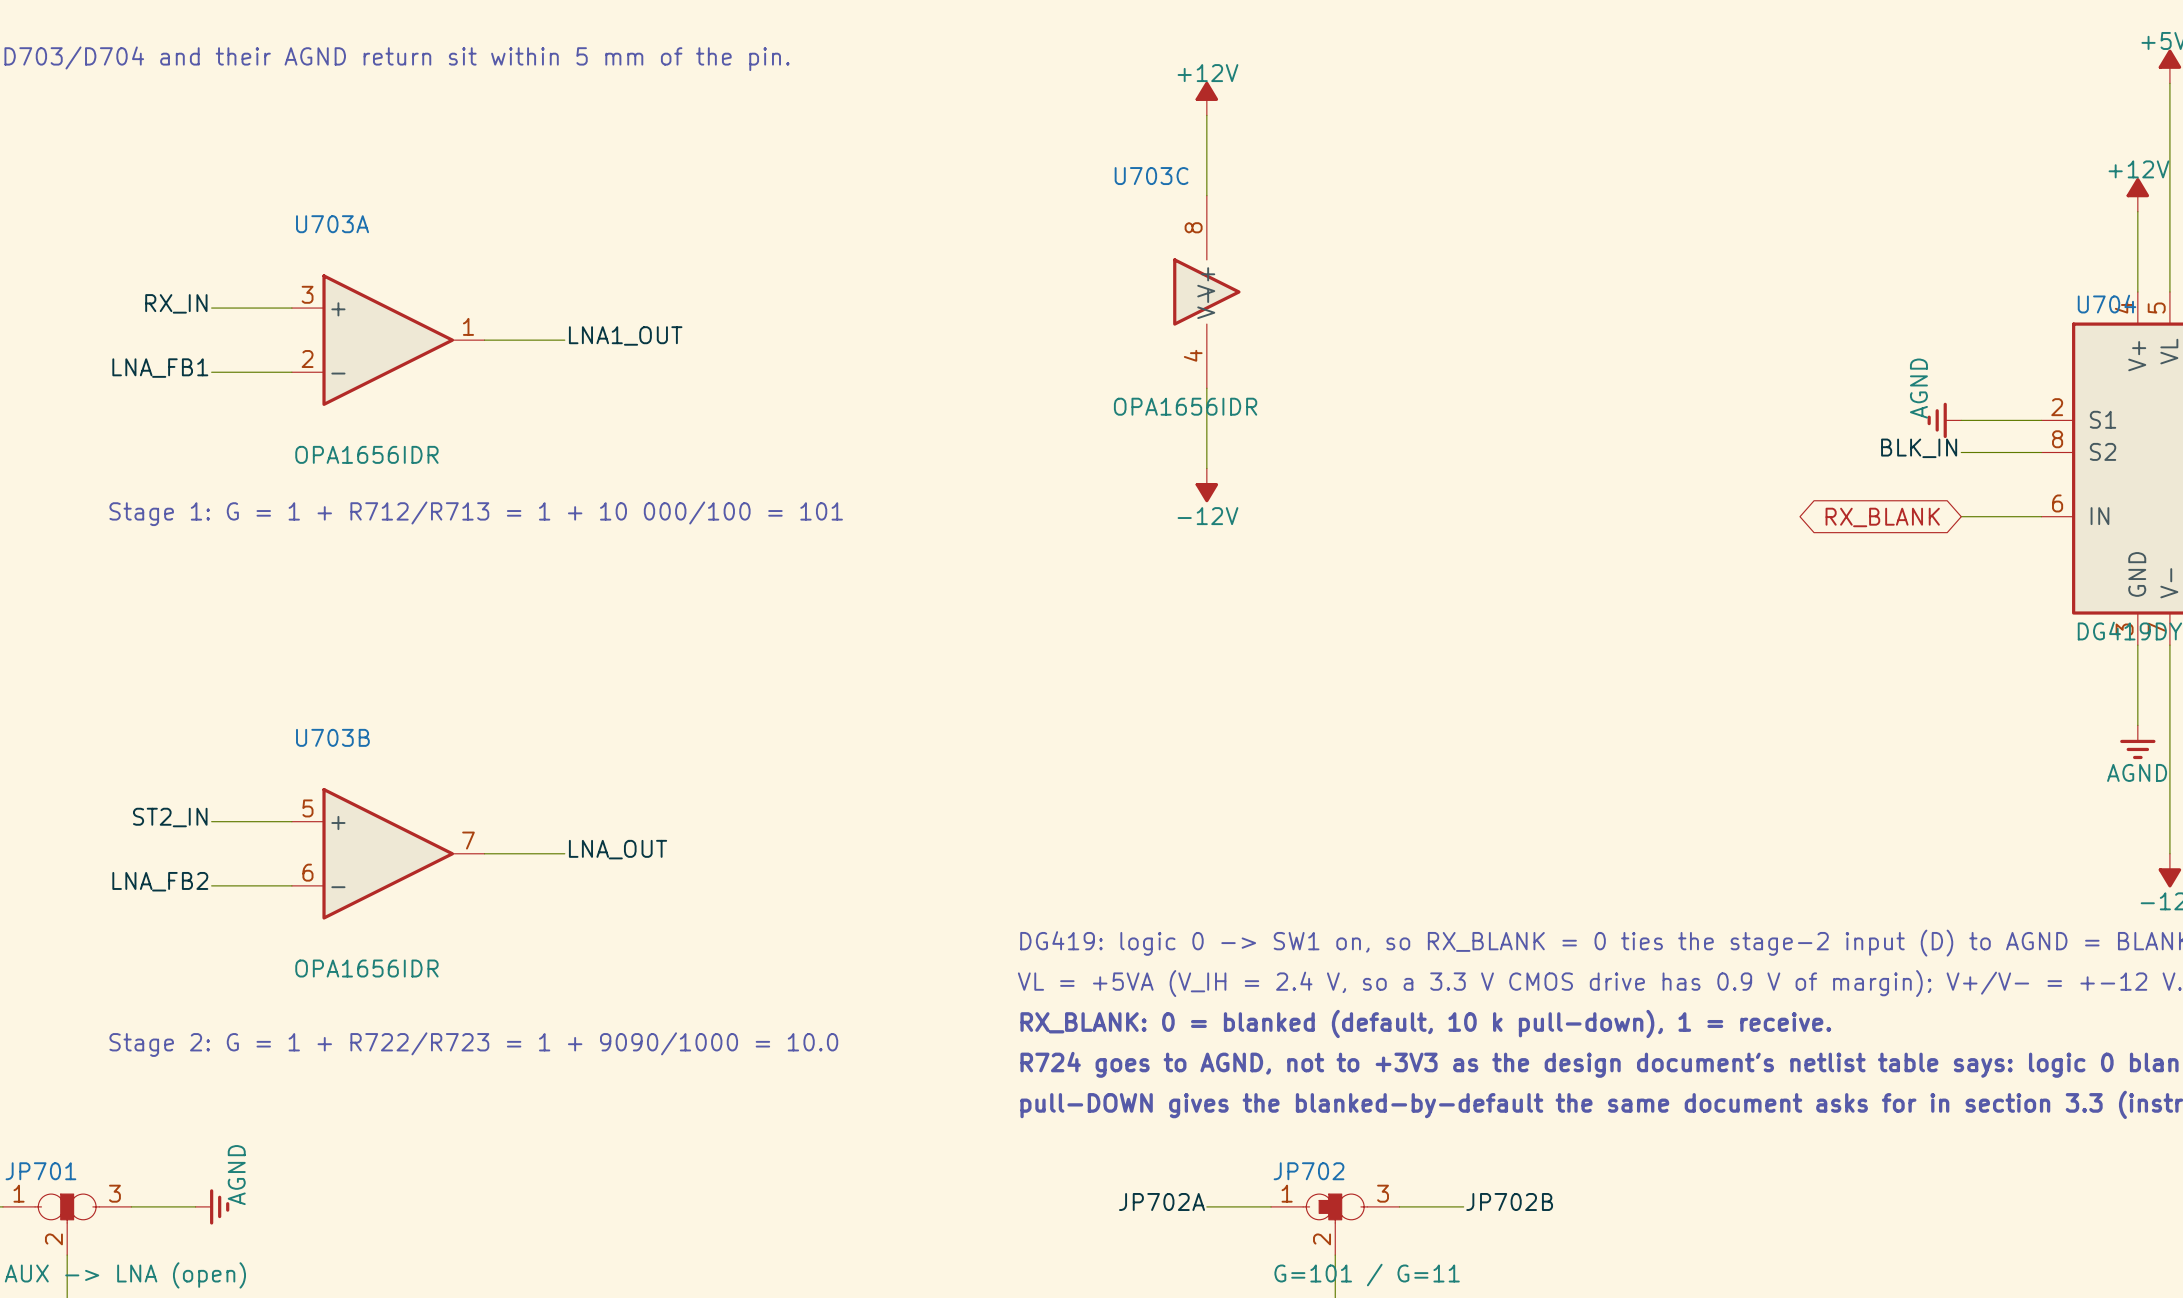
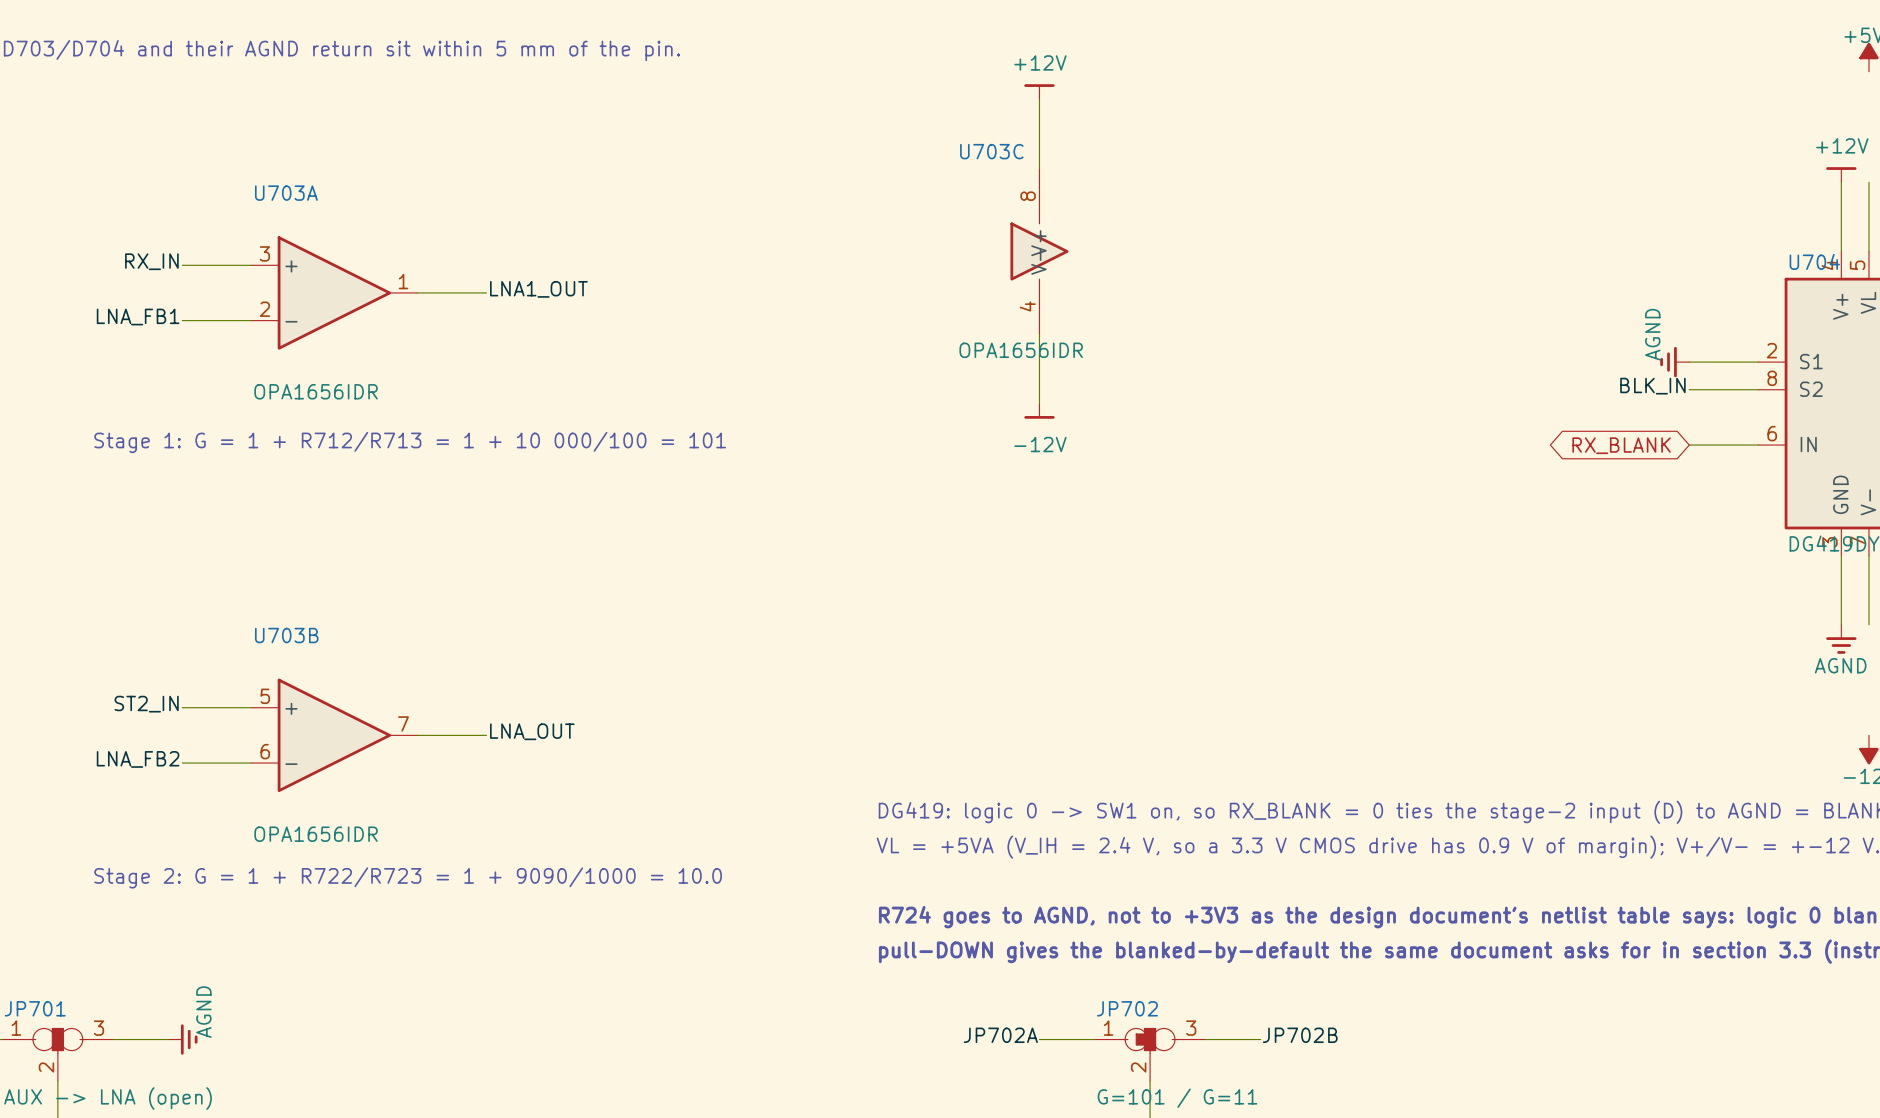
power symbol shape: [1195, 81, 1219, 116] -> [1024, 84, 1055, 100]
wire: (2169, 83) (2169, 211) -> none
power symbol shape: [2126, 178, 2150, 212] -> [1826, 167, 1857, 183]
power symbol shape: [1195, 468, 1219, 503] -> [1024, 403, 1055, 419]
wire: (2169, 725) (2169, 853) -> none
text: RX_BLANK: 0 = blanked (default, 10 k pull-down), 1 = receive. (1425, 1023) -> none
text position: Stage 2: G = 1 + R722/R723 = 1 + 9090/1000 = 10.0 (473, 1044) -> Stage 2: G = 1 + R722/R723 = 1 + 9090/1000 = 10.0 (408, 877)

